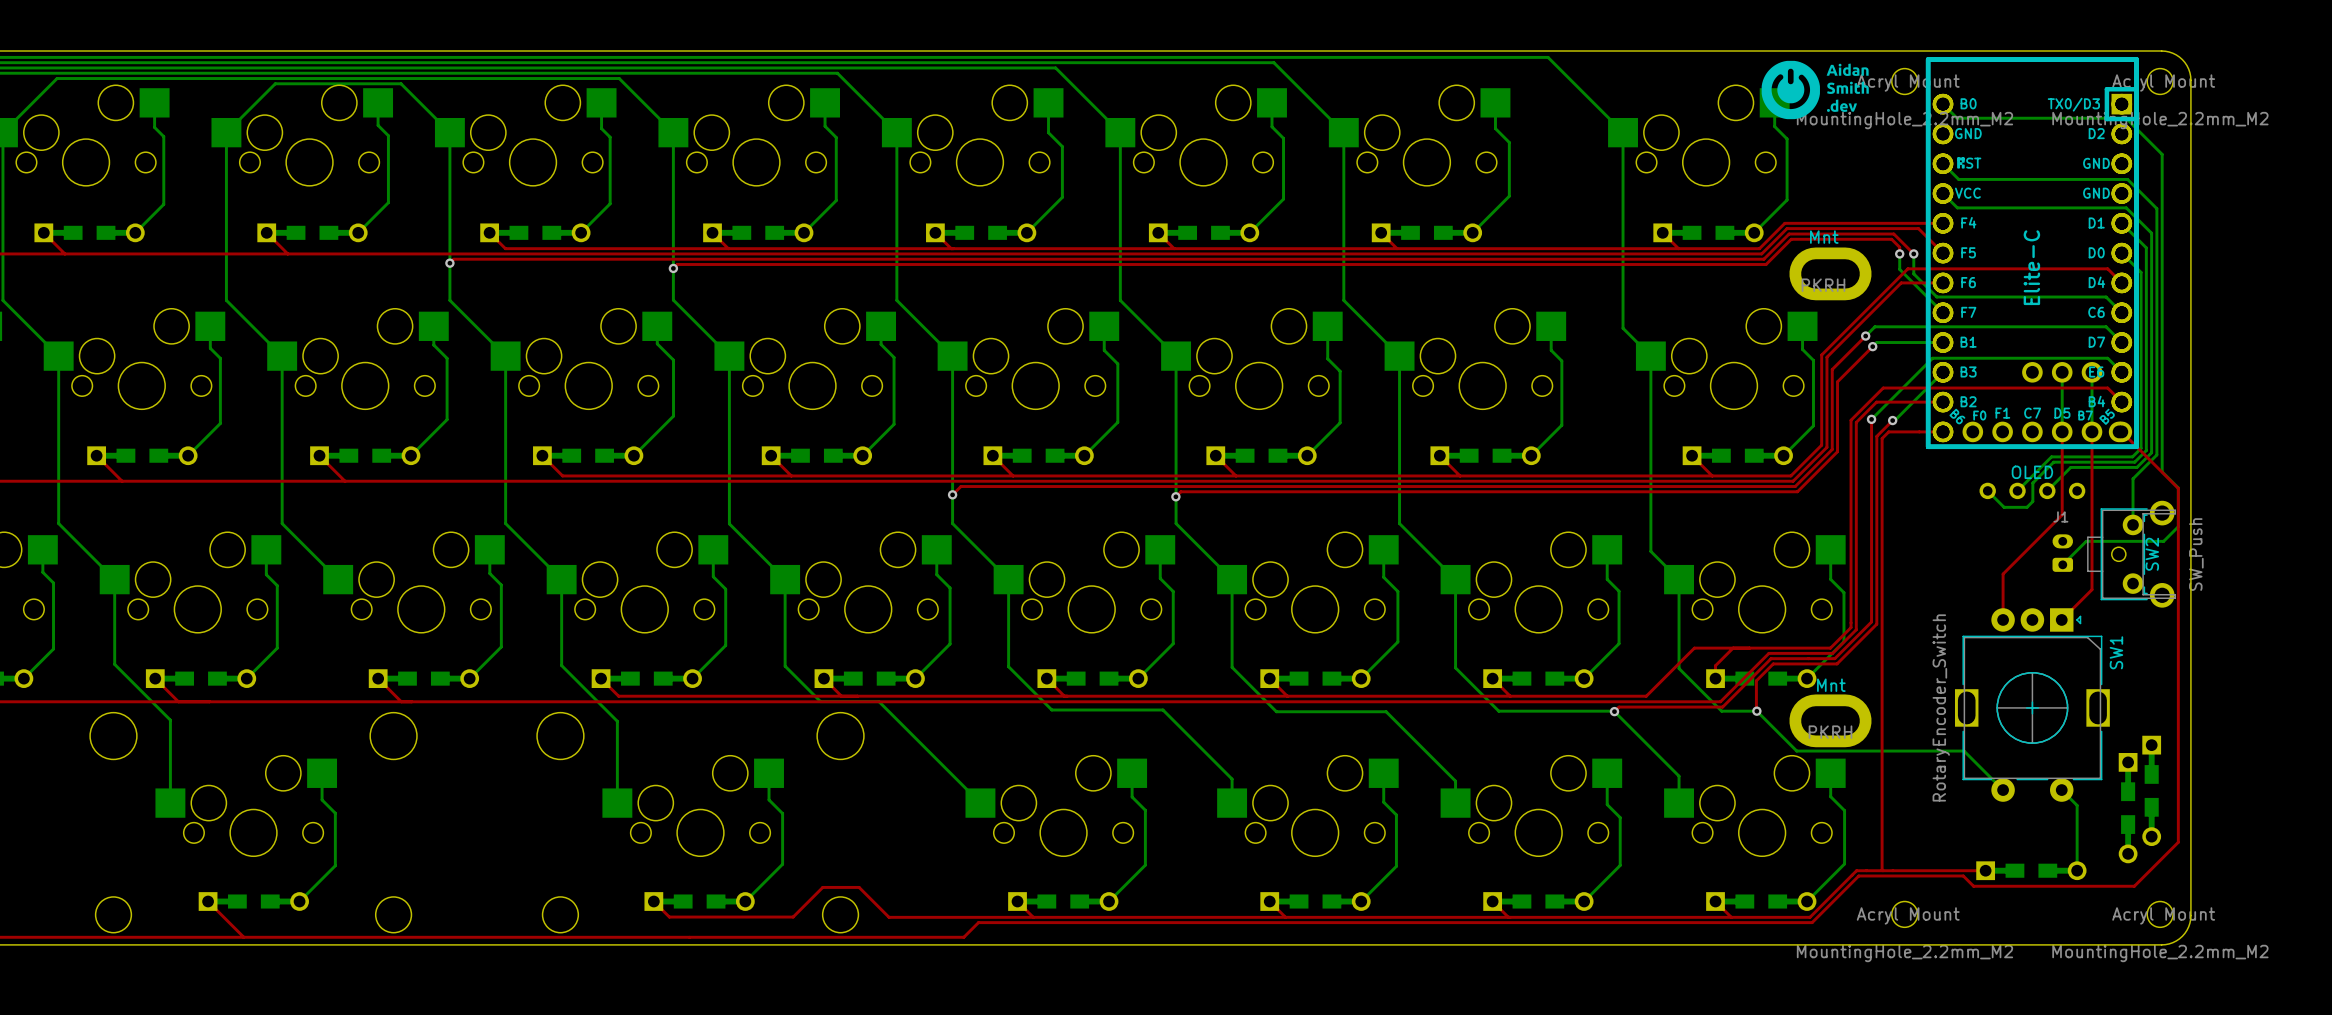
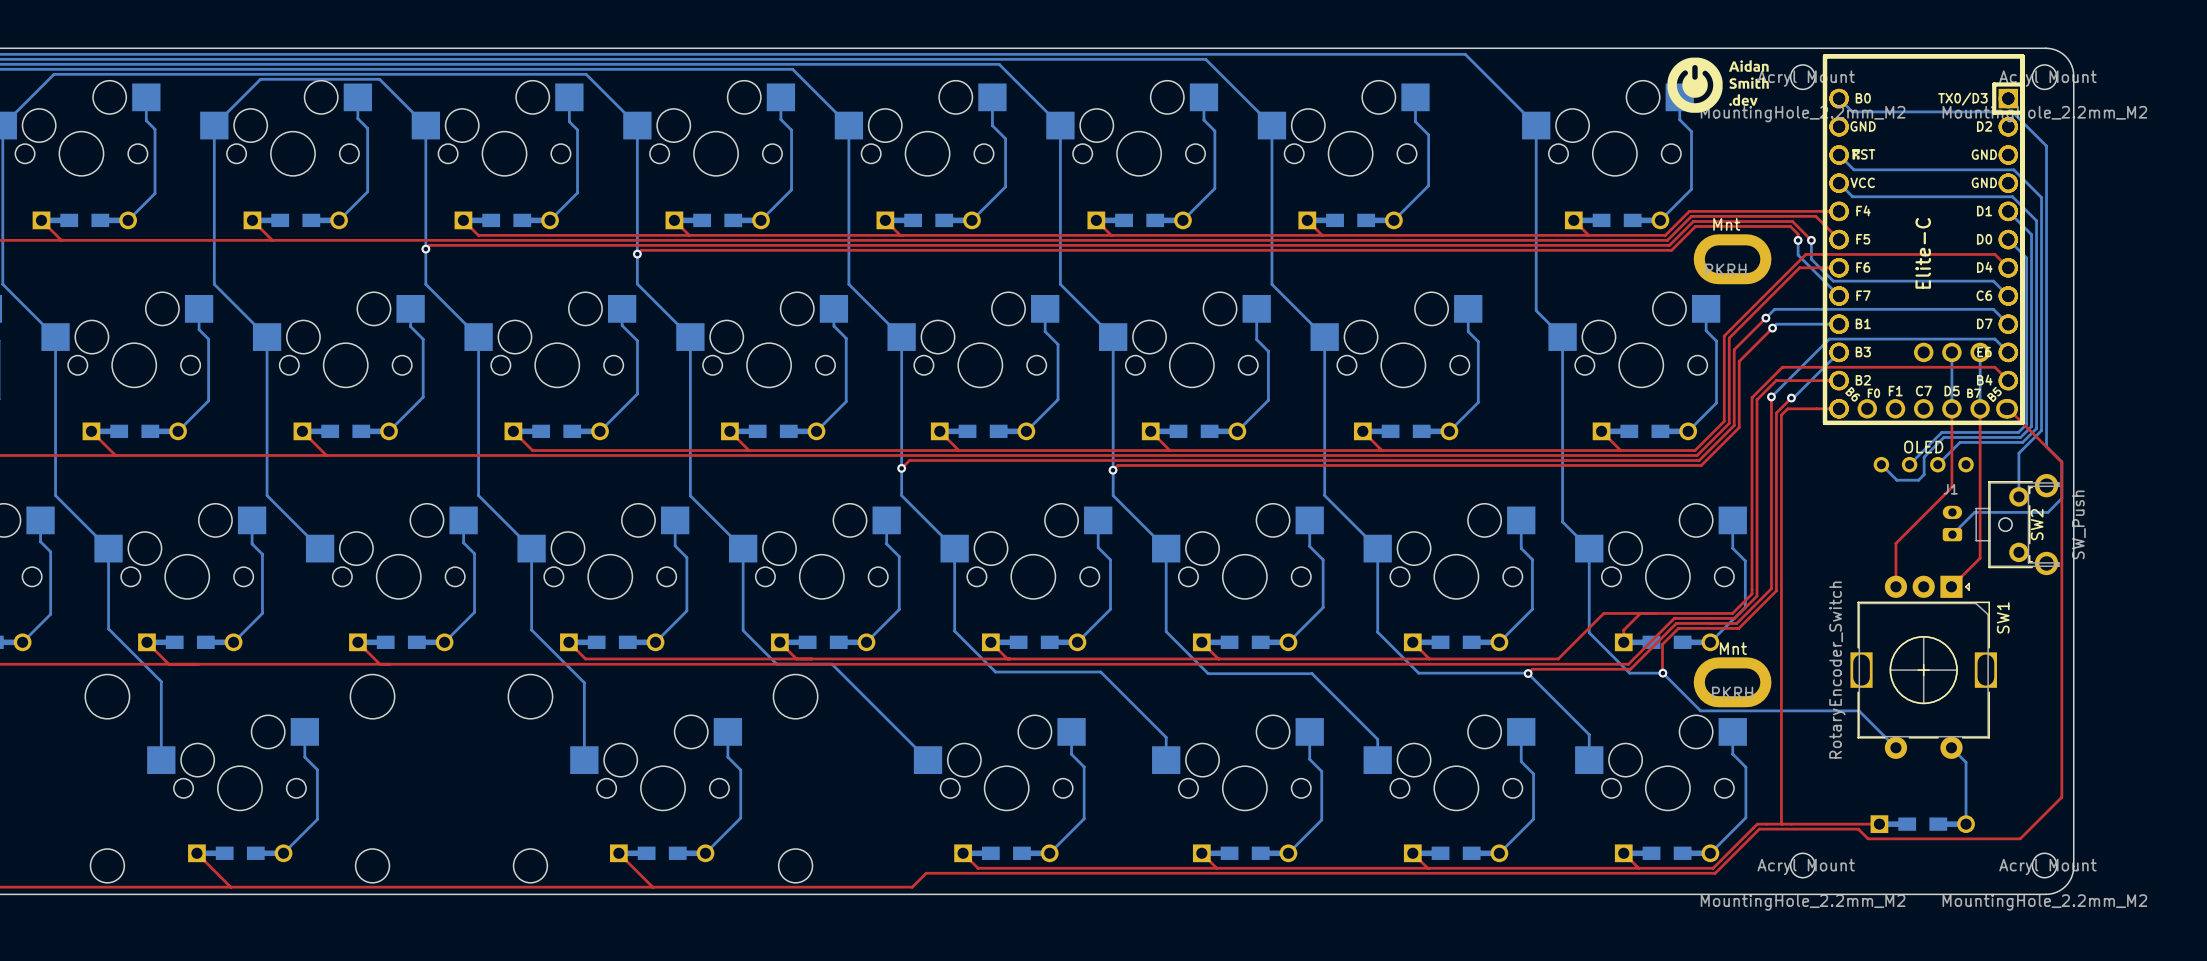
part: (2151, 790) -> none
part: (2128, 808) -> none
top track: (669, 917) (793, 917) (822, 887) (859, 887) (889, 917) (1033, 917) -> (633, 868) (652, 887)

